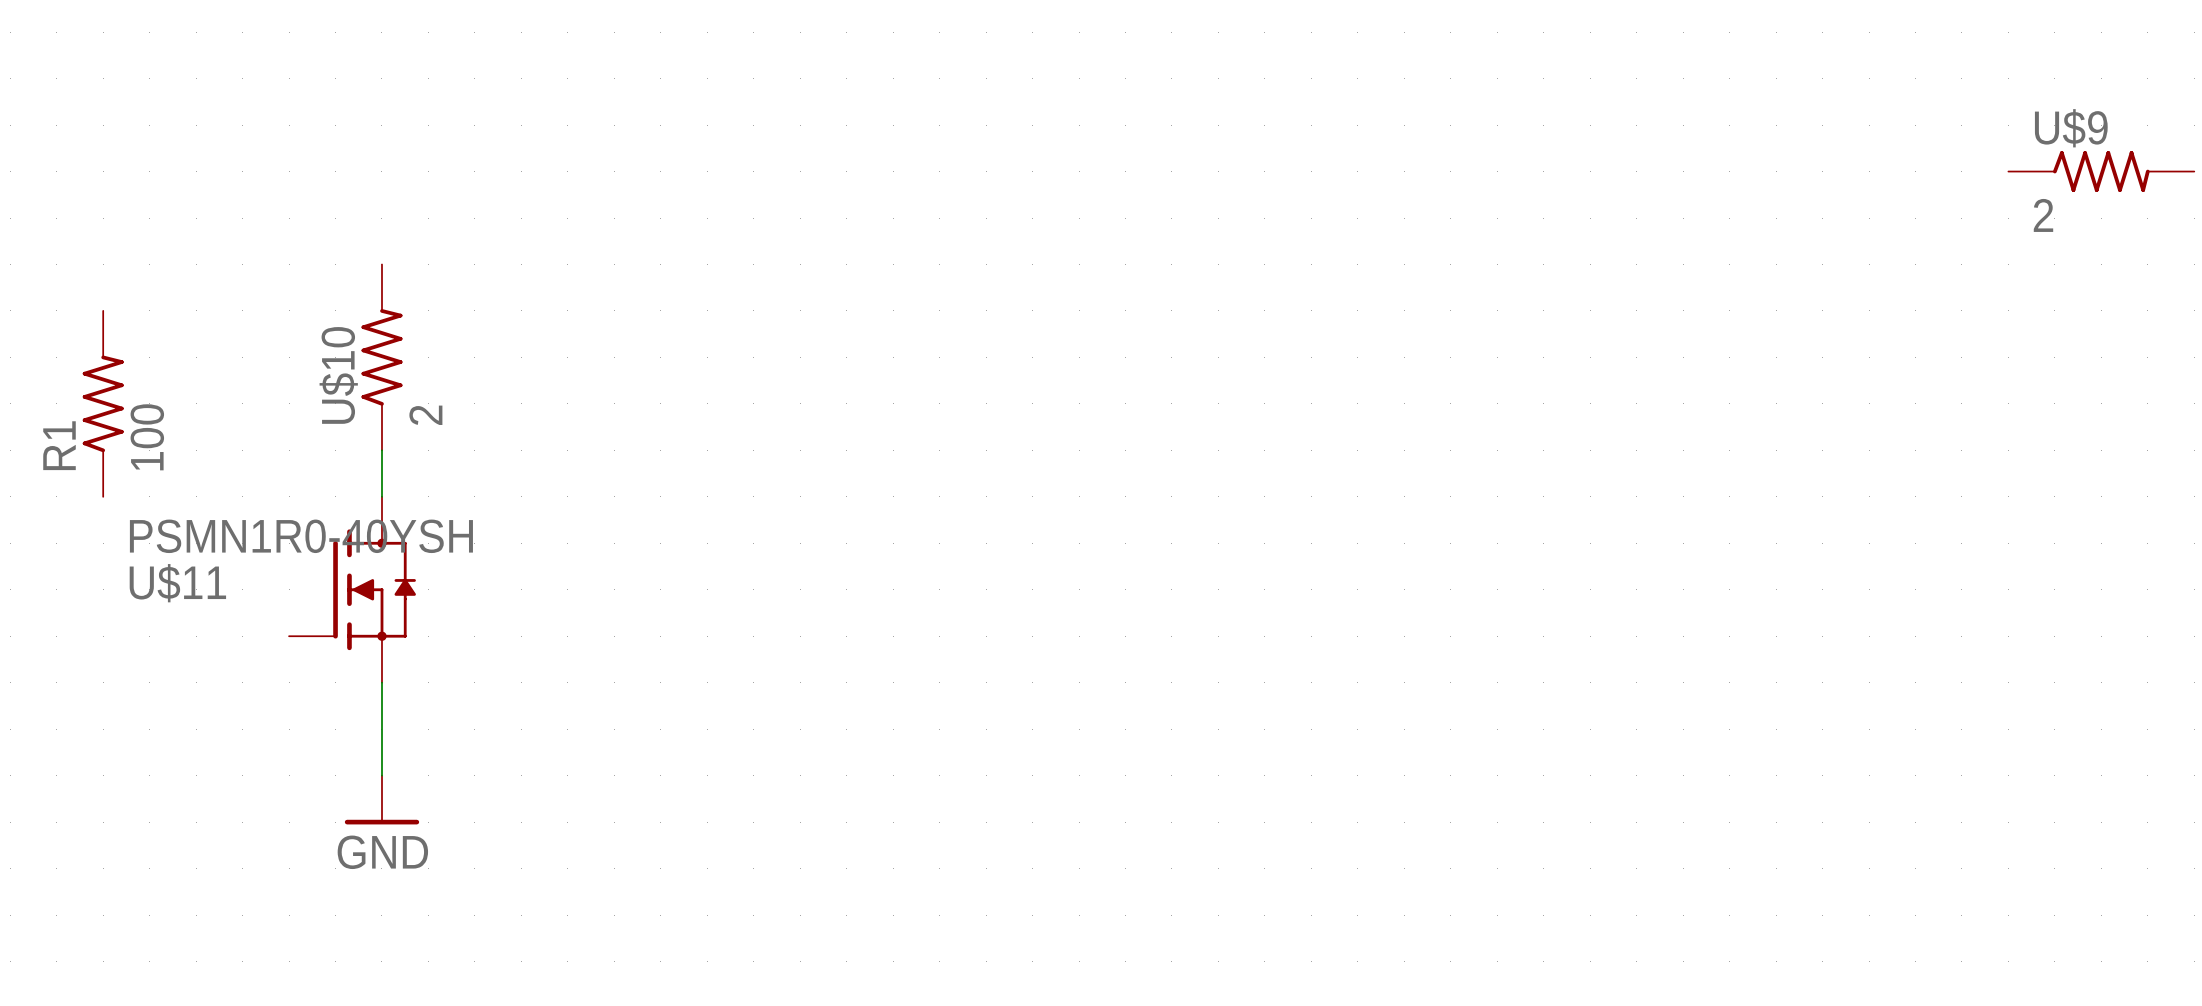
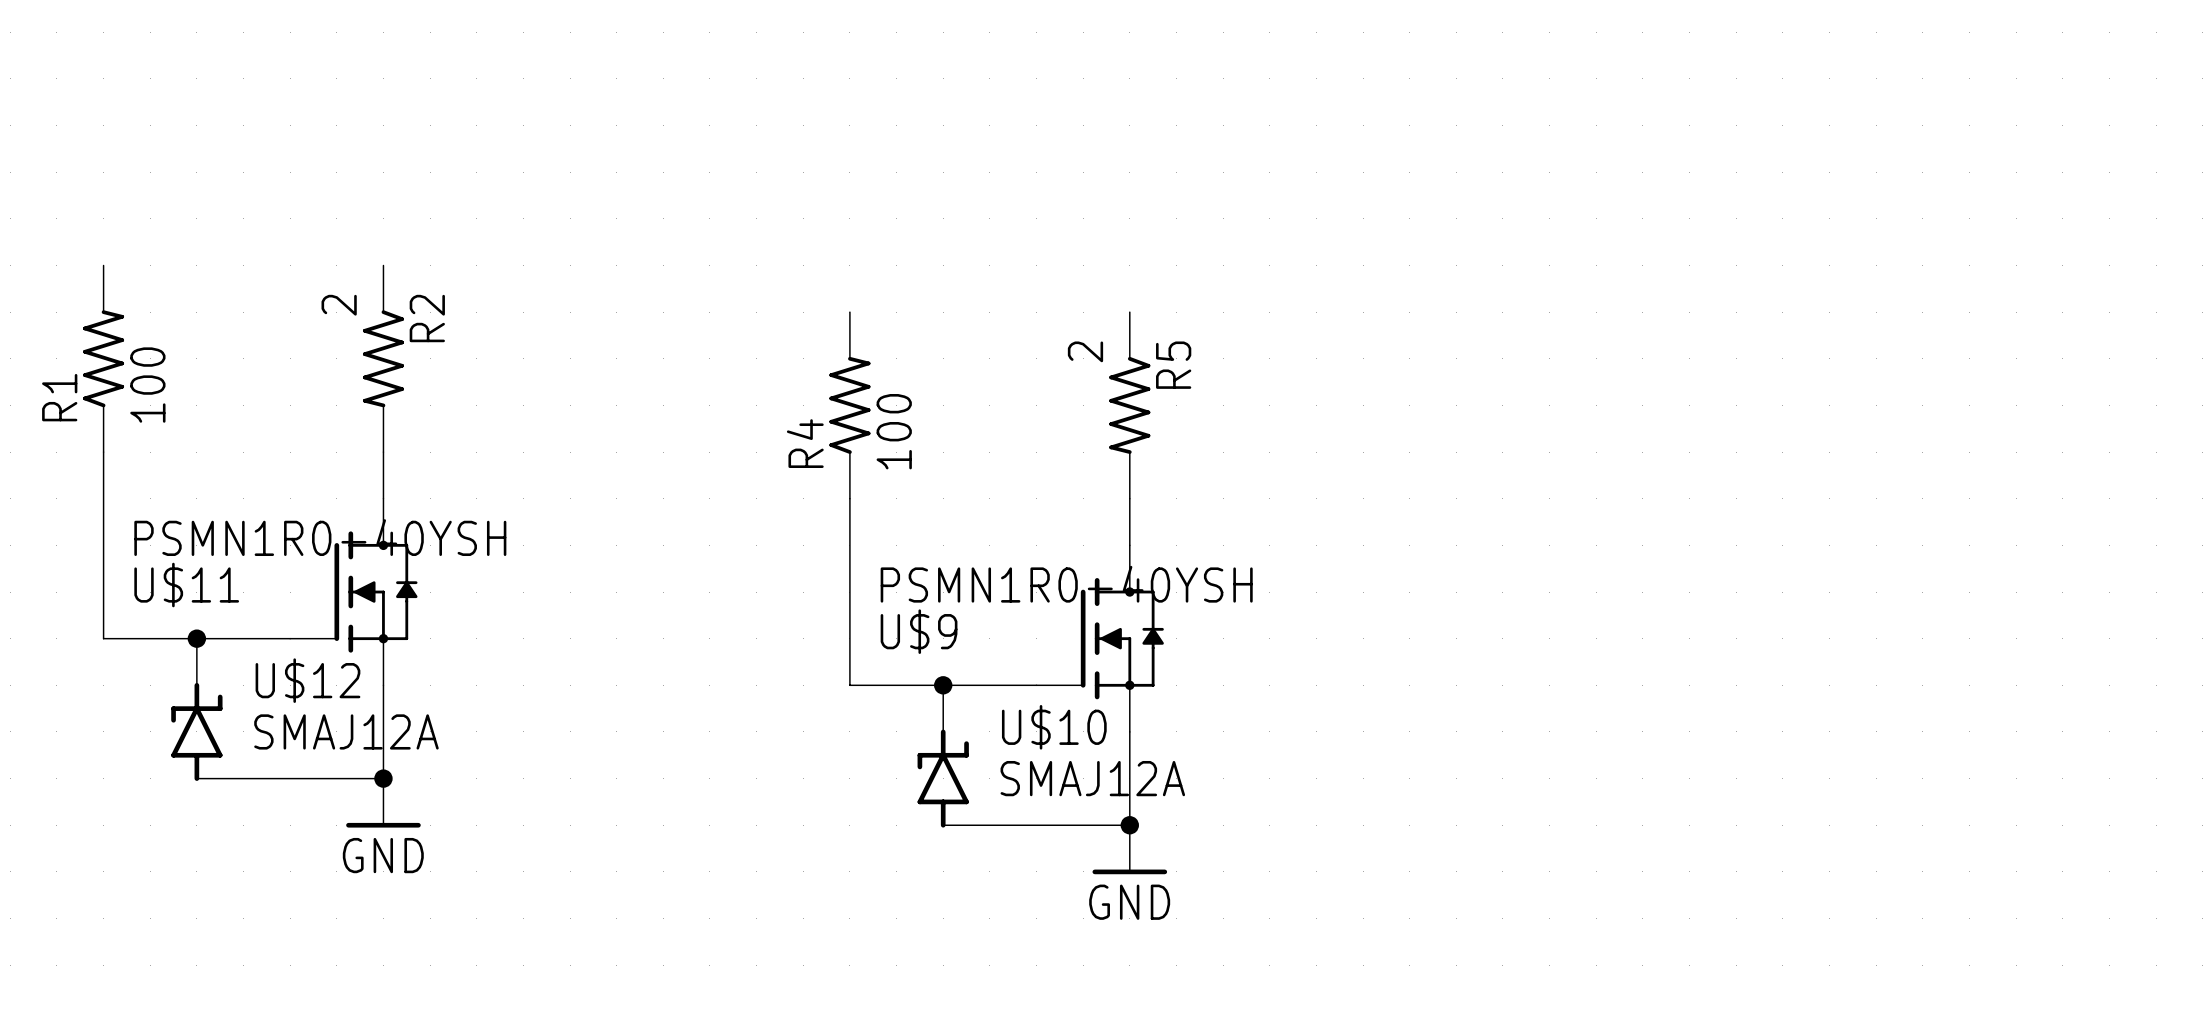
U$9 name position: U$9 (2071, 128) -> U$9 (919, 631)
U$9 symbol: [2008, 151, 2195, 192] -> [1036, 545, 1164, 732]
U$9 value: 2 (2043, 215) -> PSMN1R0-40YSH (1066, 584)
U$10 symbol: [361, 264, 403, 451] -> [917, 729, 969, 828]
R2: none -> 2 (383, 358)
U$10 name position: U$10 (338, 375) -> U$10 (1054, 727)
R1 position: (103, 403) -> (103, 358)
R4: none -> 100 (849, 405)
R5: none -> 2 (1129, 405)
U$10 value: 2 (425, 415) -> SMAJ12A (1092, 778)
wire: none -> (103, 452) (103, 638) (290, 638)
wire: none -> (849, 498) (849, 685) (1036, 685)
wire: none -> (1129, 498) (1129, 545)
wire: none -> (196, 638) (196, 685)
junction: none -> (196, 638)
wire: none -> (943, 685) (943, 731)
junction: none -> (943, 685)
U$12: none -> SMAJ12A (196, 731)
wire: none -> (1129, 731) (1129, 825) (943, 825)
wire: none -> (196, 778) (383, 778)
junction: none -> (383, 778)
junction: none -> (1129, 825)
power symbol: none -> GND (1129, 849)

